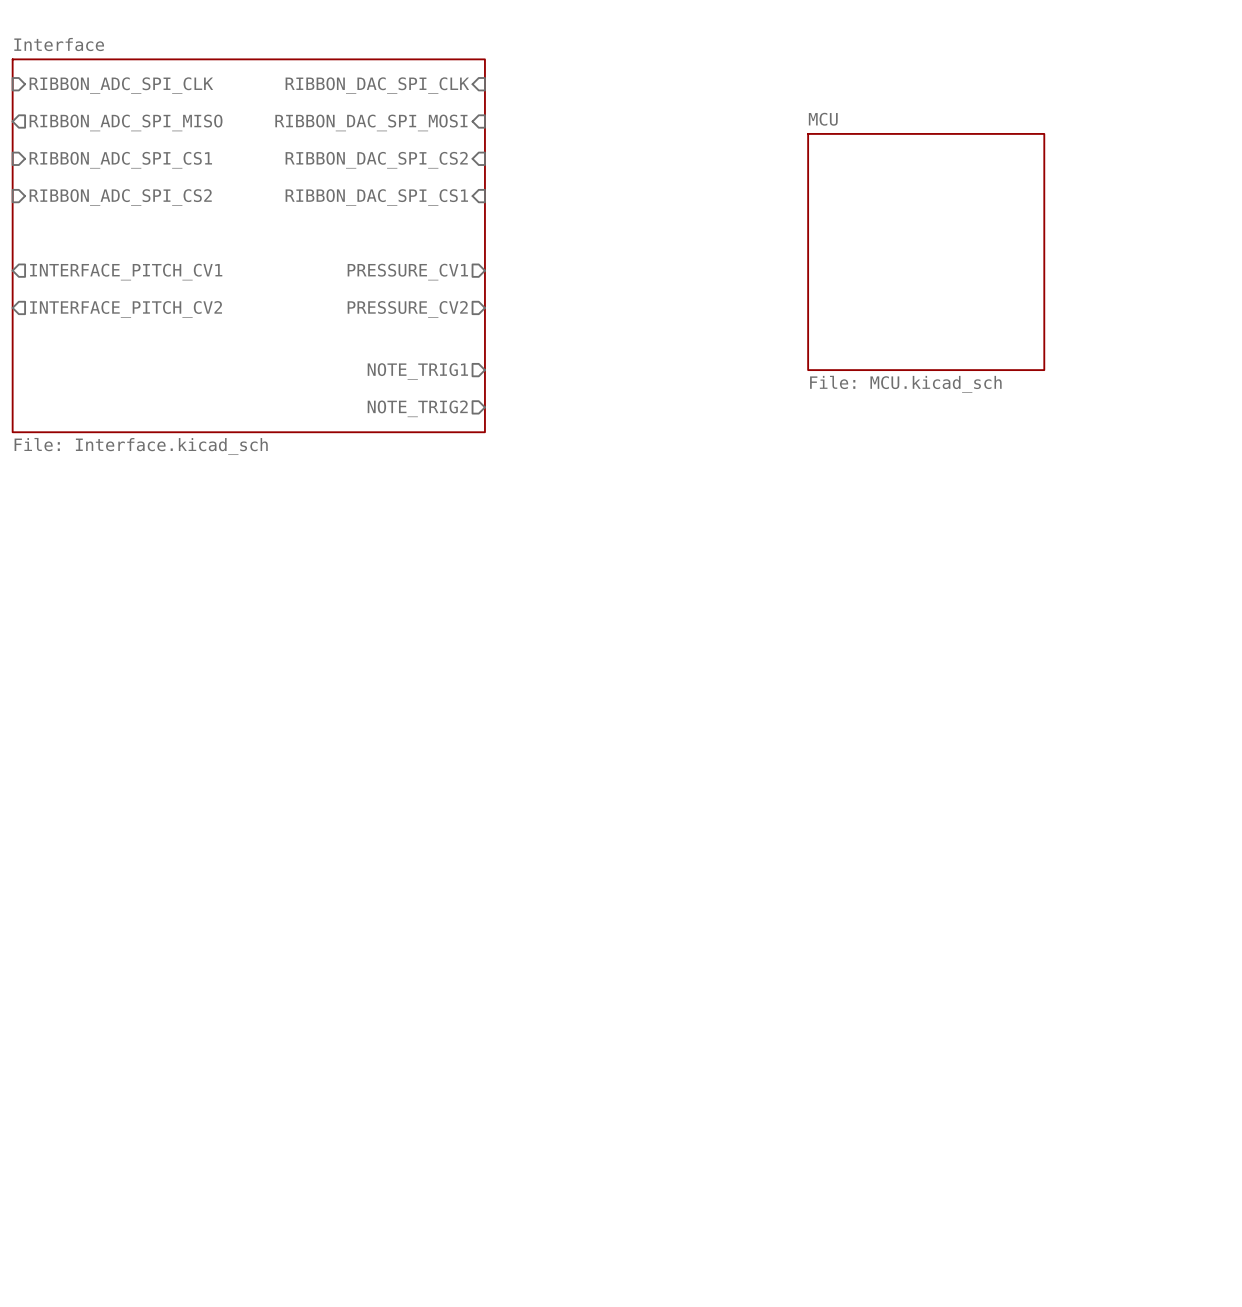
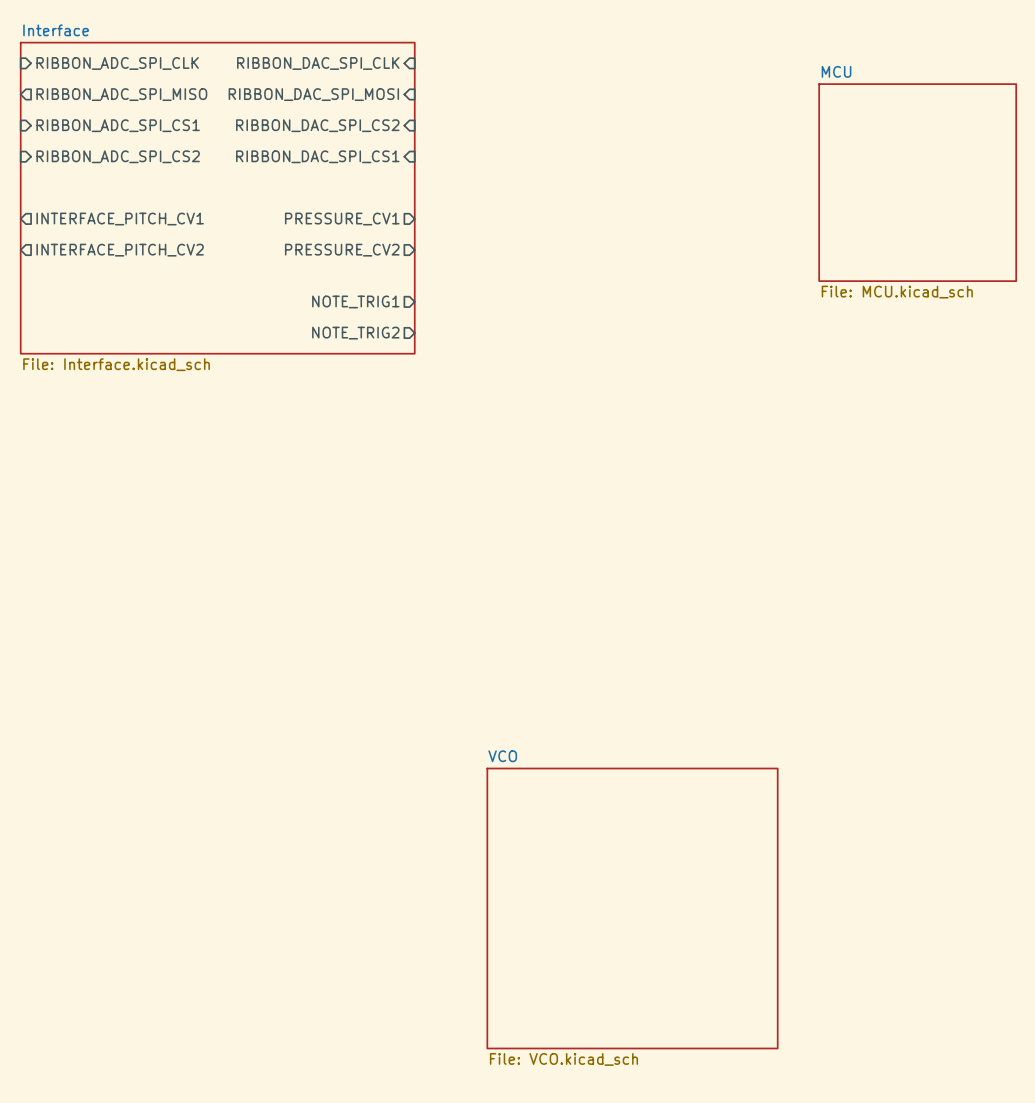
sheet MCU position: (926, 252) -> (917, 182)
sheet VCO: none -> File: VCO.kicad_sch (632, 908)

